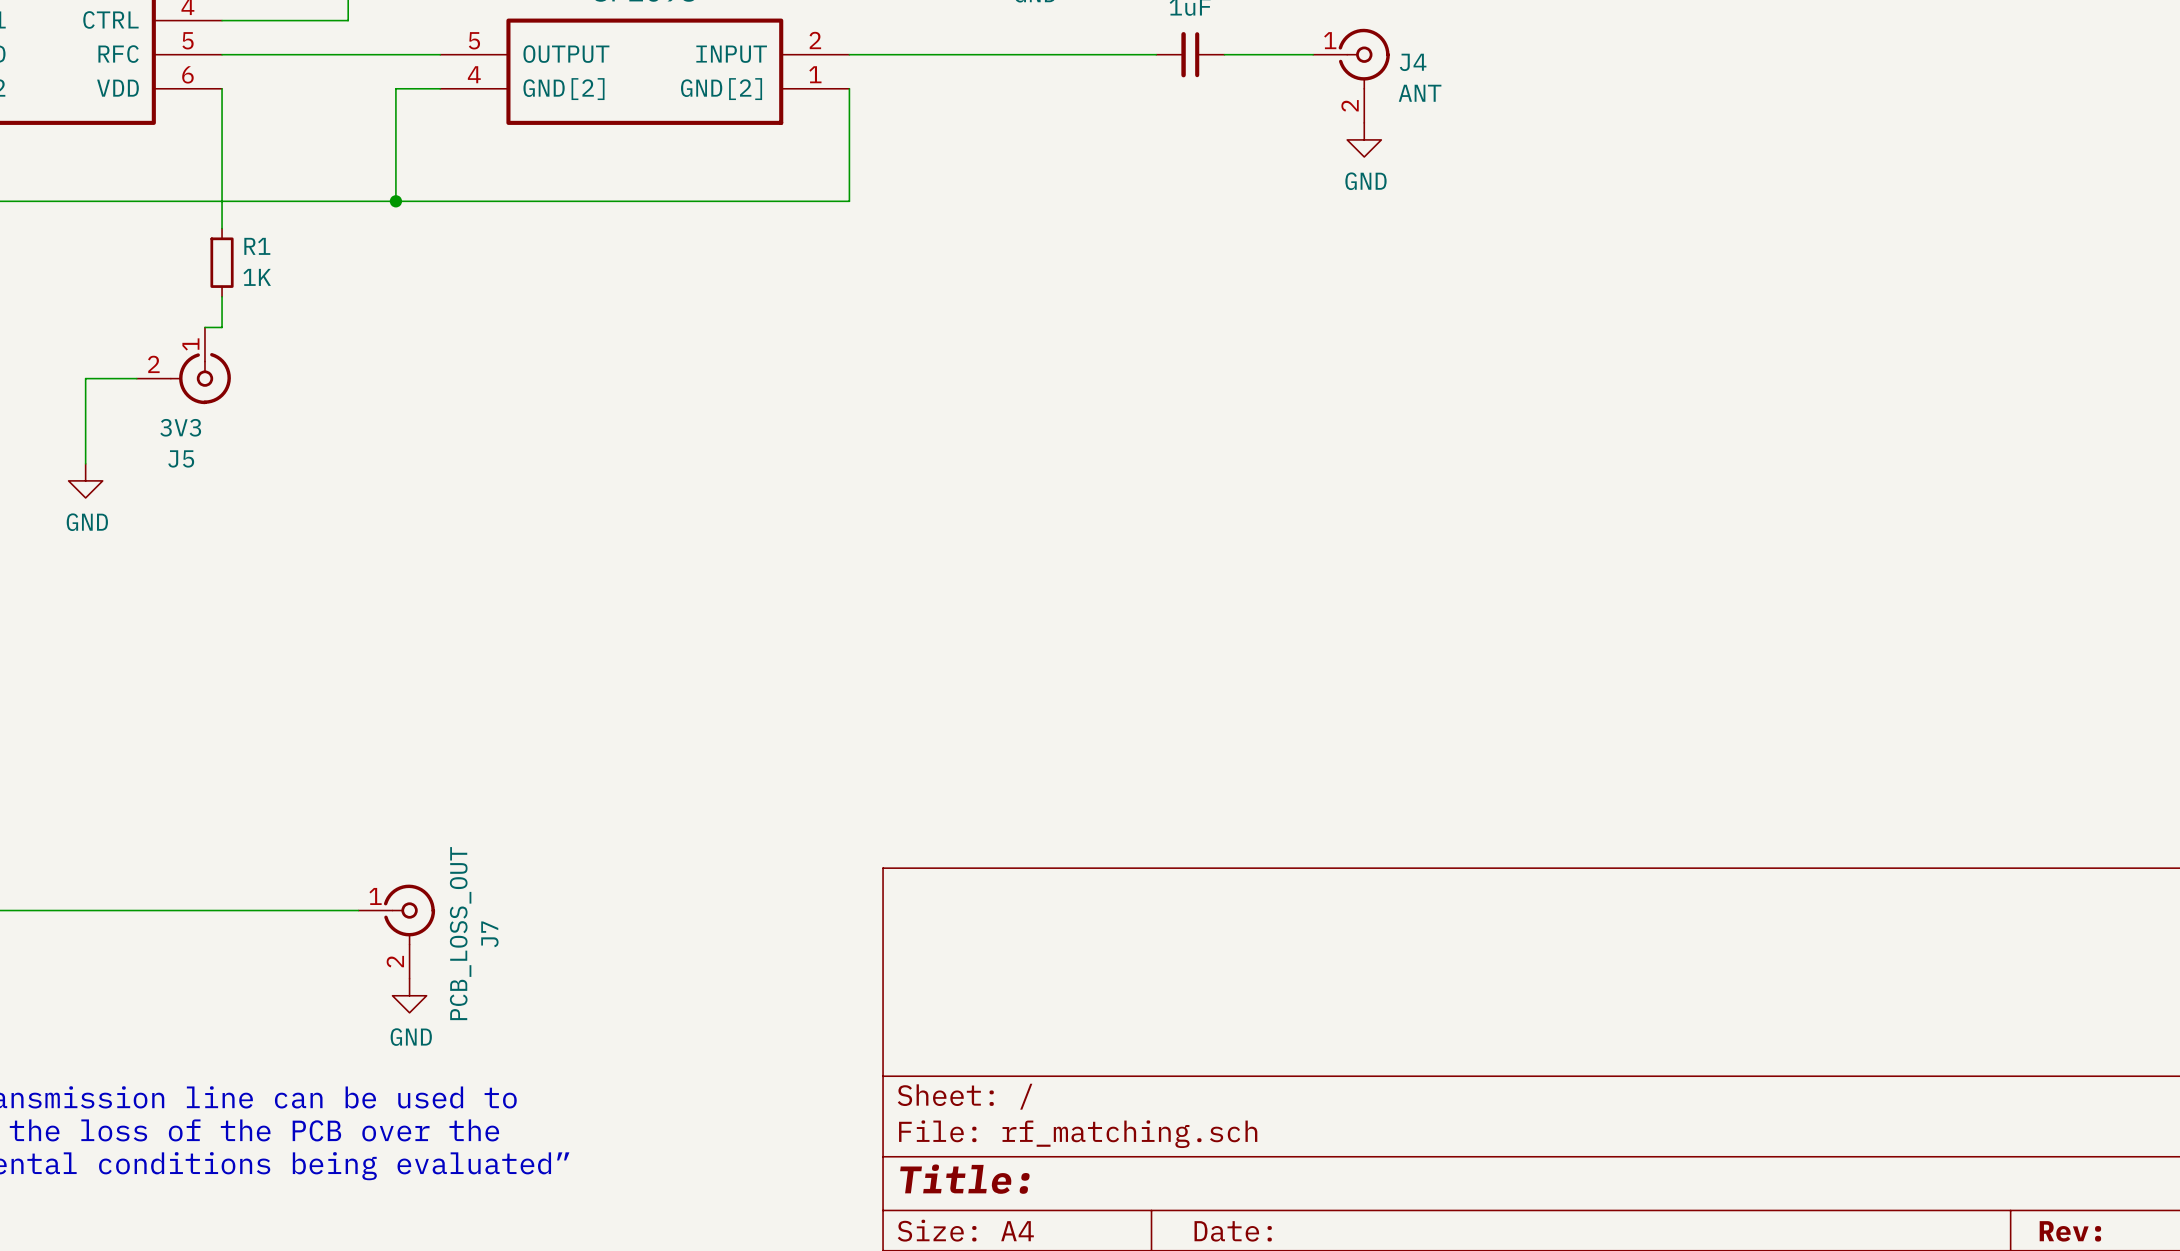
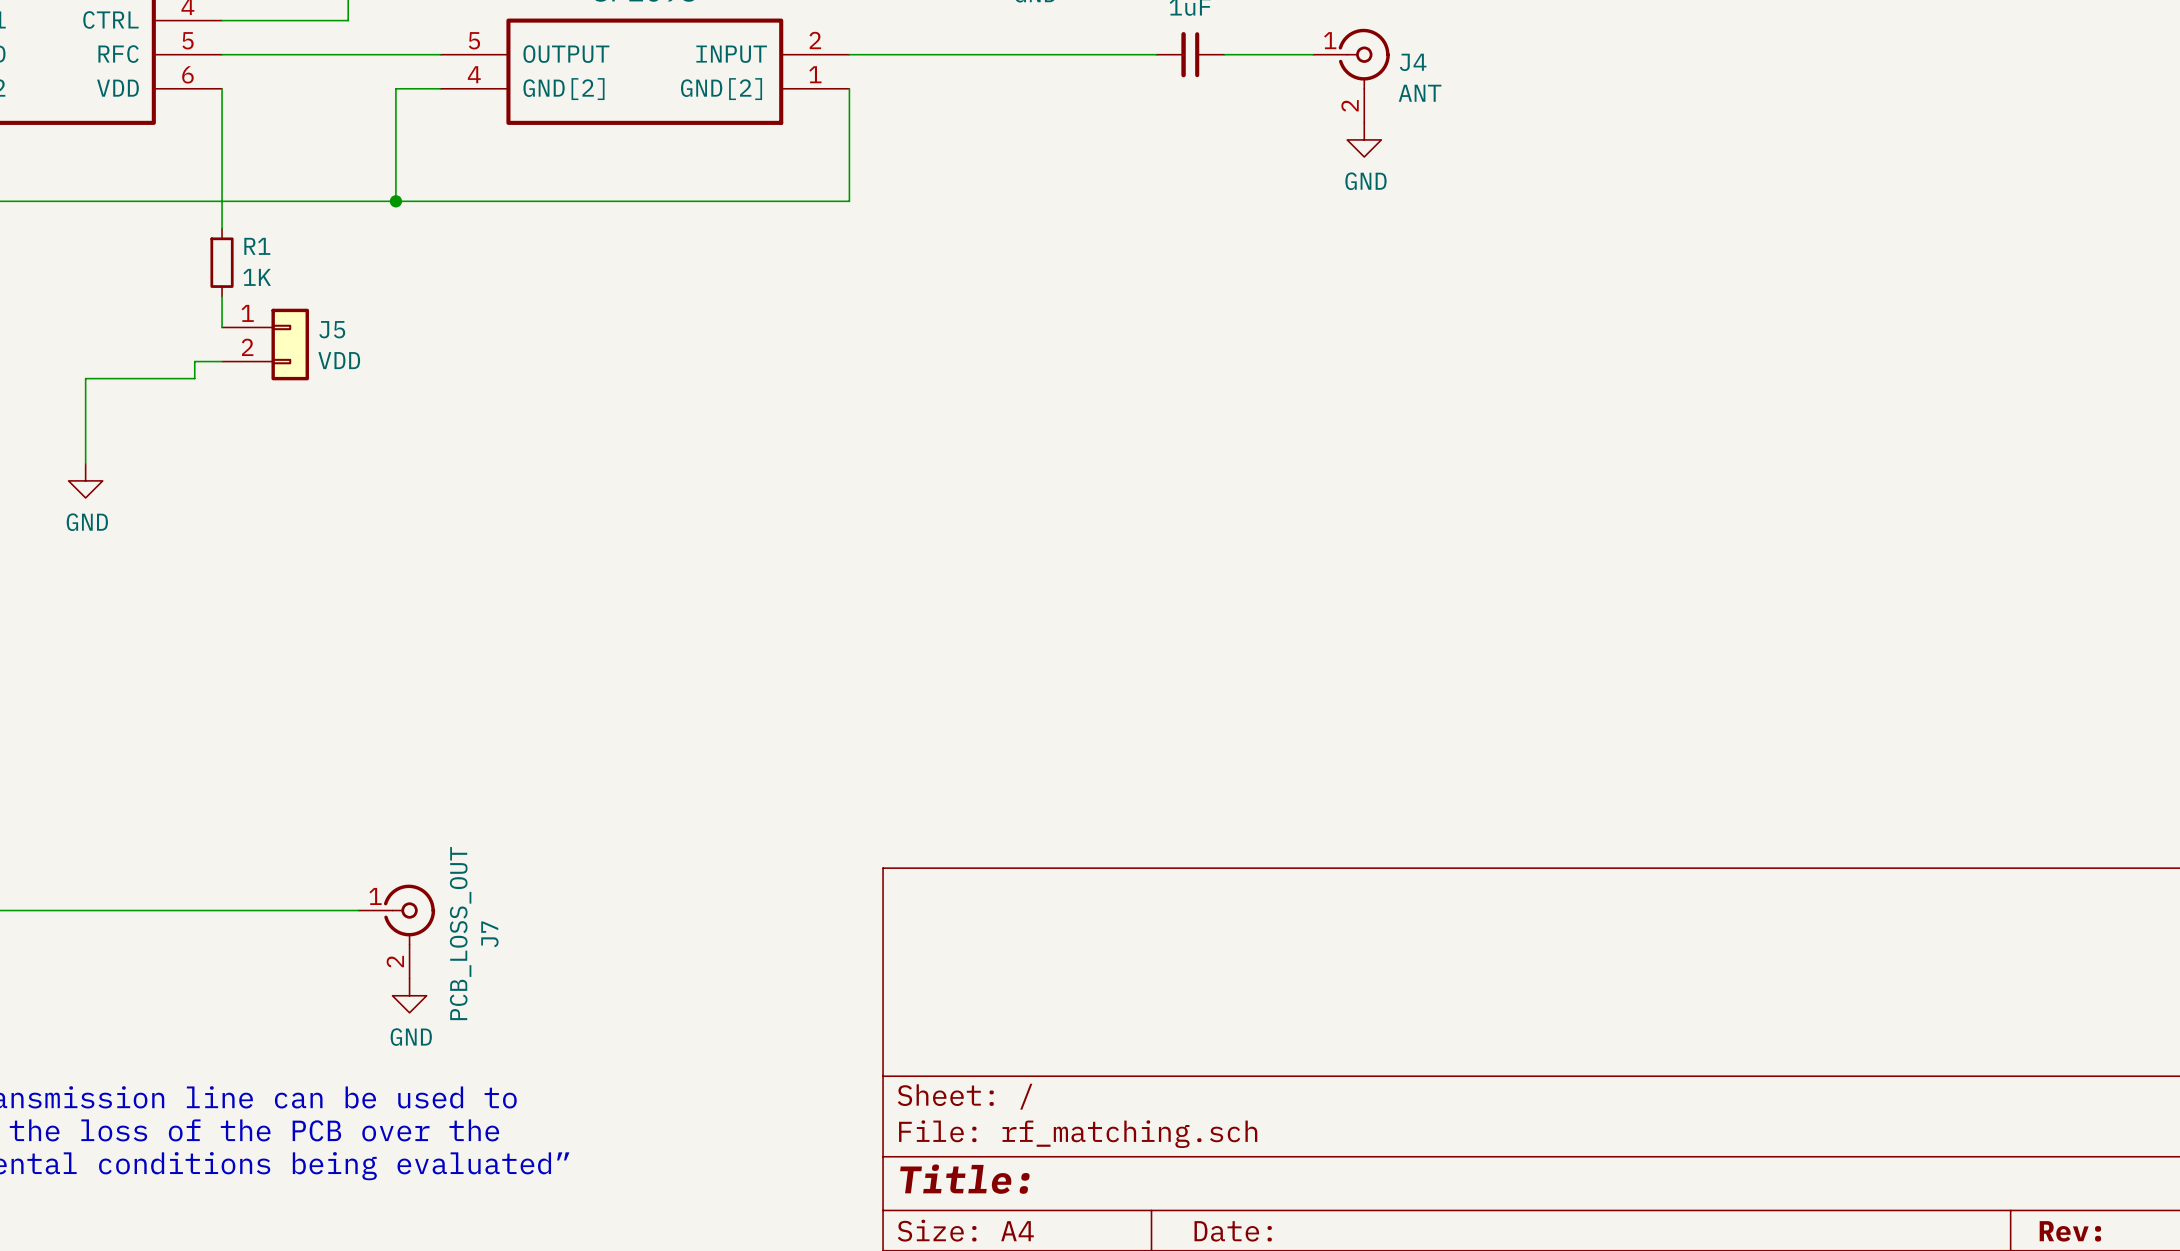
J5 symbol: [136, 327, 231, 405] -> [222, 308, 309, 381]
wire: (204, 327) (222, 327) -> none
wire: none -> (222, 361) (194, 361) (194, 378) (136, 378)
J5 value: 3V3 (180, 427) -> VDD (339, 360)
J5 name position: J5 (181, 458) -> J5 (332, 329)

